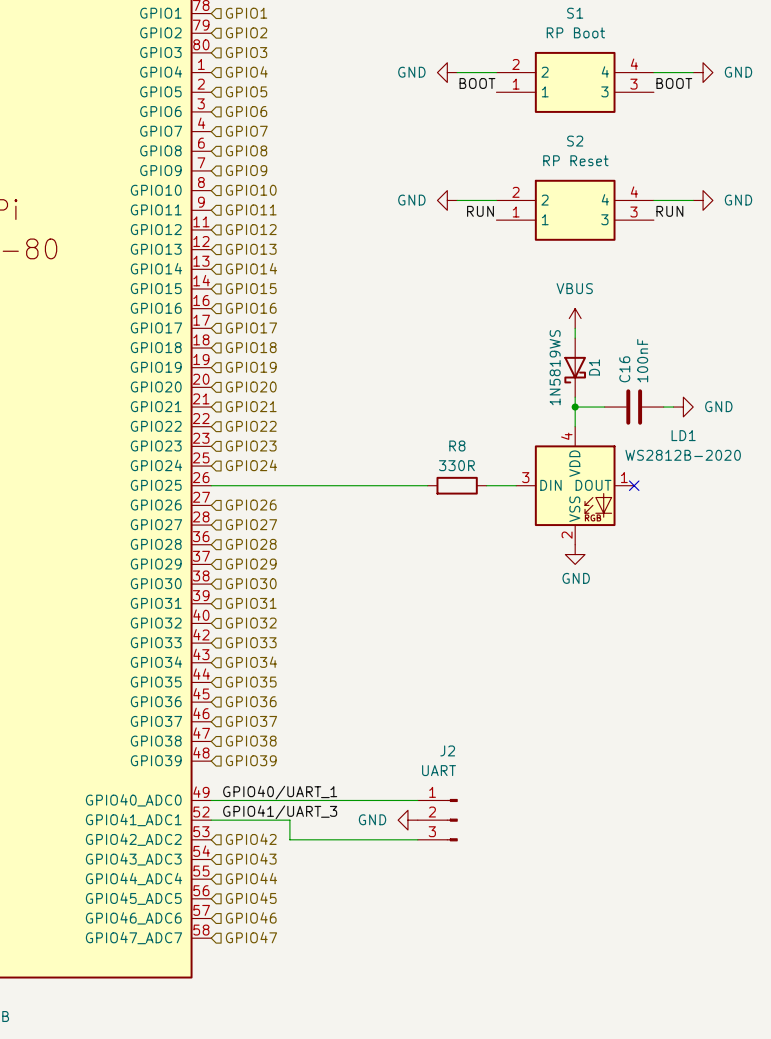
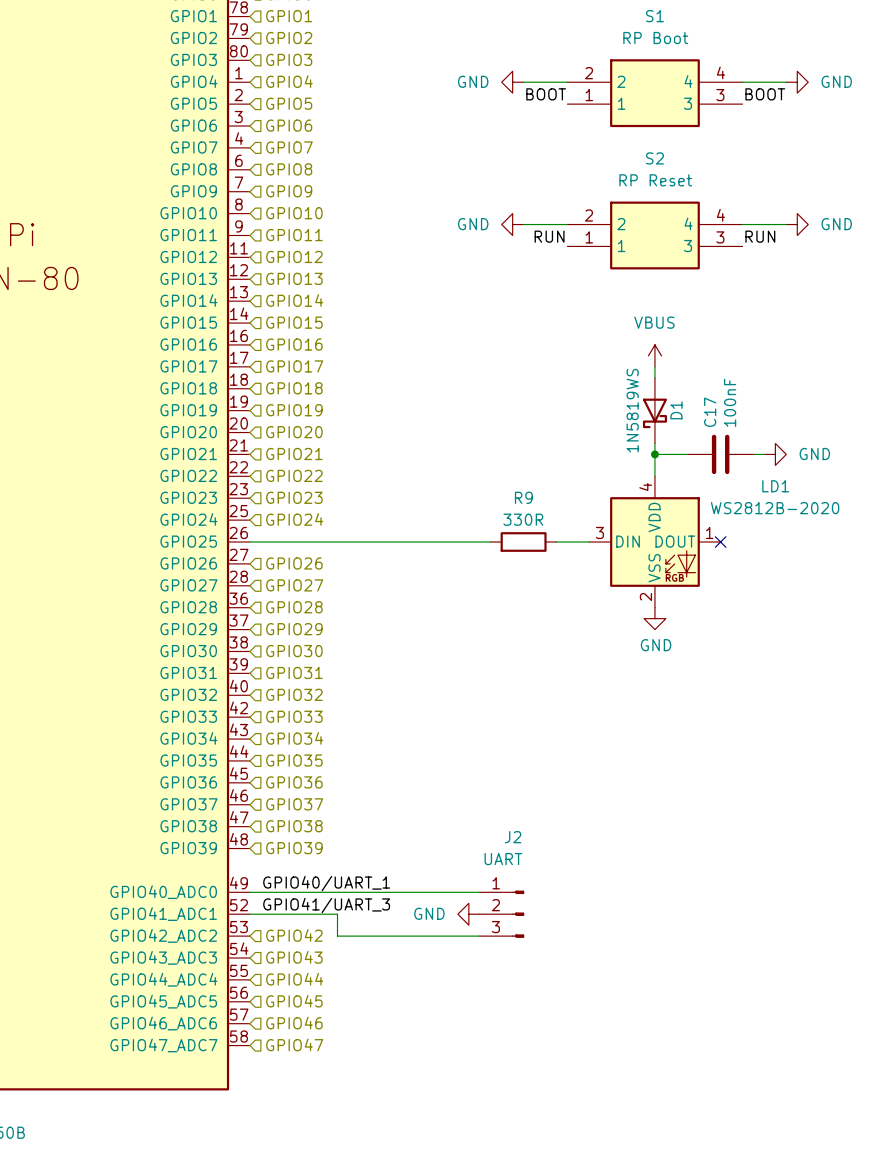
C16 name: C16 (624, 369) -> C17 (710, 412)
R8 name: R8 (457, 446) -> R9 (523, 497)

